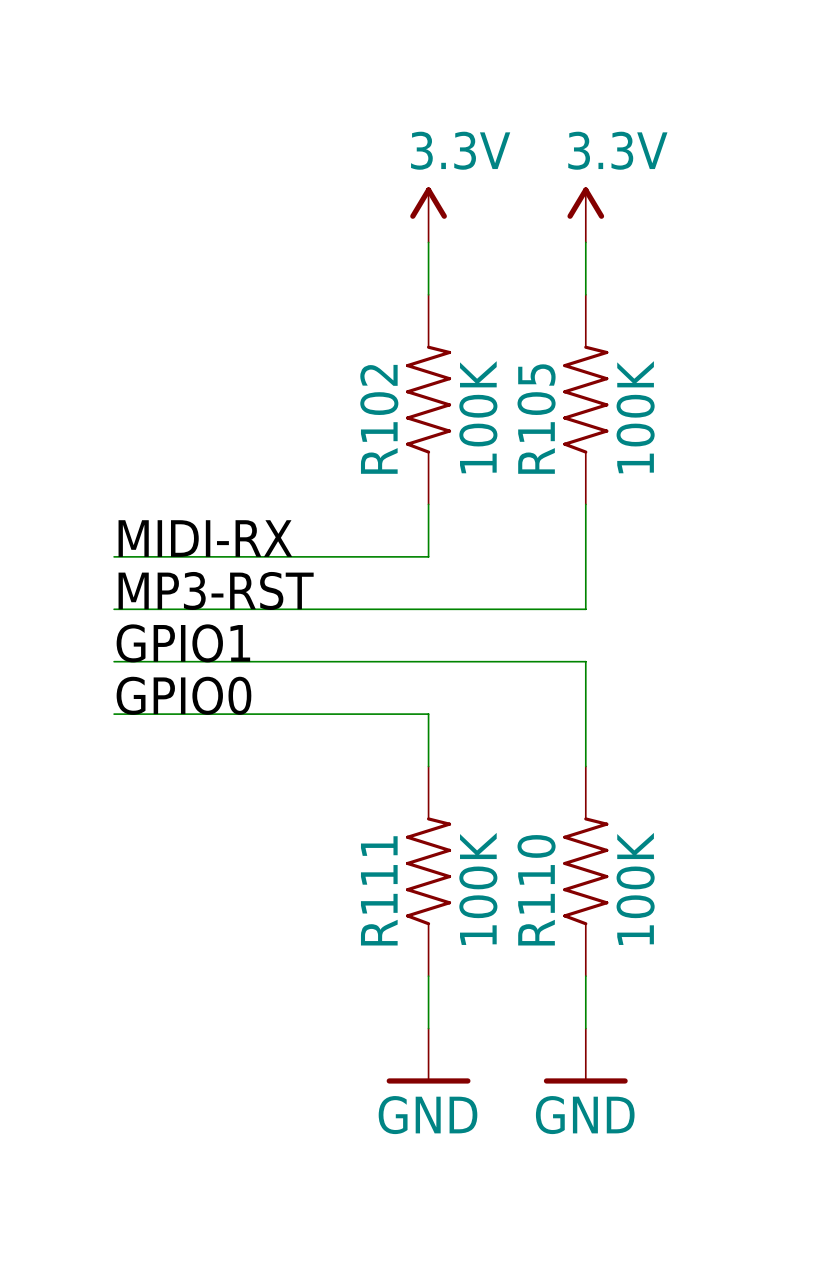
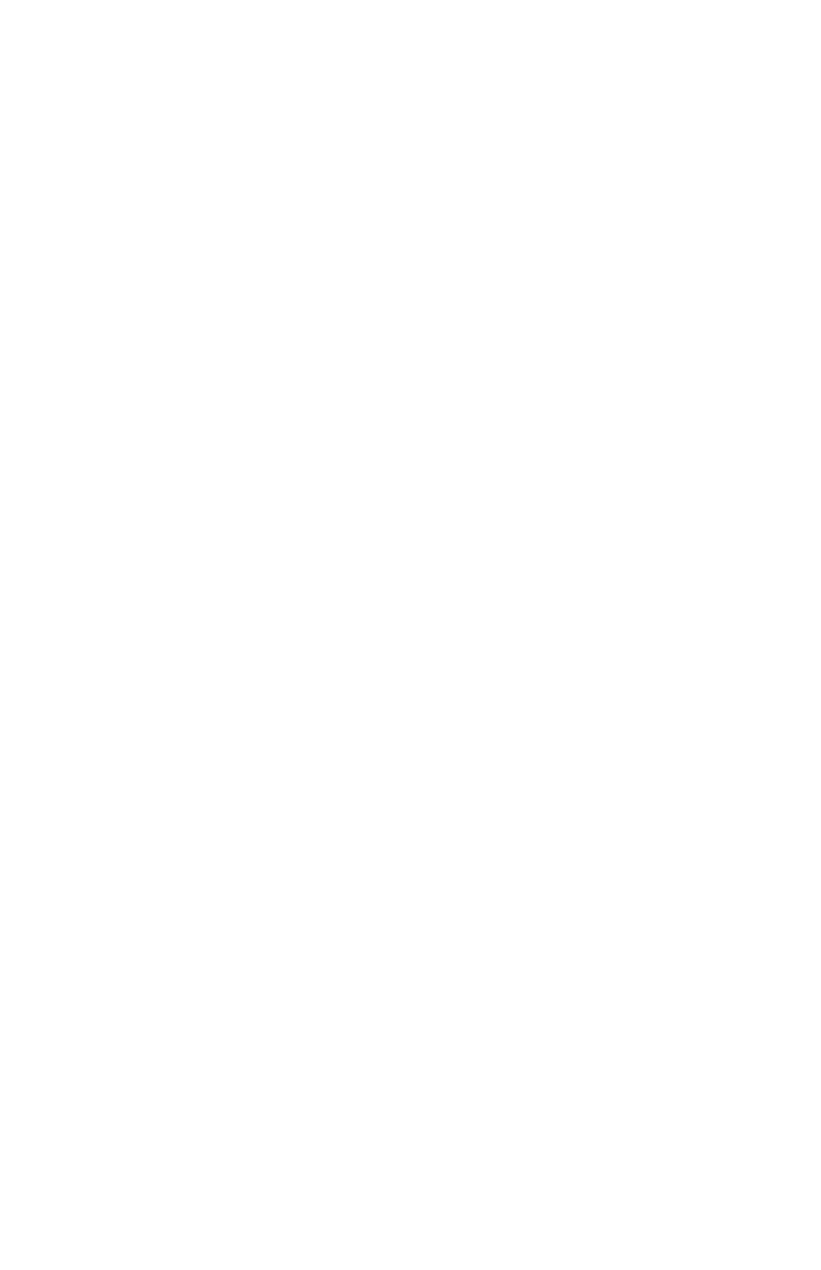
power symbol: 3.3V (428, 214) -> none
power symbol: 3.3V (585, 214) -> none
wire: (428, 242) (428, 294) -> none
wire: (585, 242) (585, 294) -> none
R102: 100K (428, 399) -> none
R105: 100K (585, 399) -> none
wire: (428, 504) (428, 556) (114, 556) -> none
wire: (585, 504) (585, 609) (114, 609) -> none
label: MIDI-RX (205, 538) -> none
label: MP3-RST (216, 590) -> none
label: GPIO1 (183, 643) -> none
wire: (114, 661) (585, 661) (585, 766) -> none
label: GPIO0 (183, 695) -> none
wire: (114, 714) (428, 714) (428, 766) -> none
R111: 100K (428, 871) -> none
R110: 100K (585, 871) -> none
wire: (428, 976) (428, 1028) -> none
wire: (585, 976) (585, 1028) -> none
power symbol: GND (428, 1056) -> none
power symbol: GND (585, 1056) -> none

